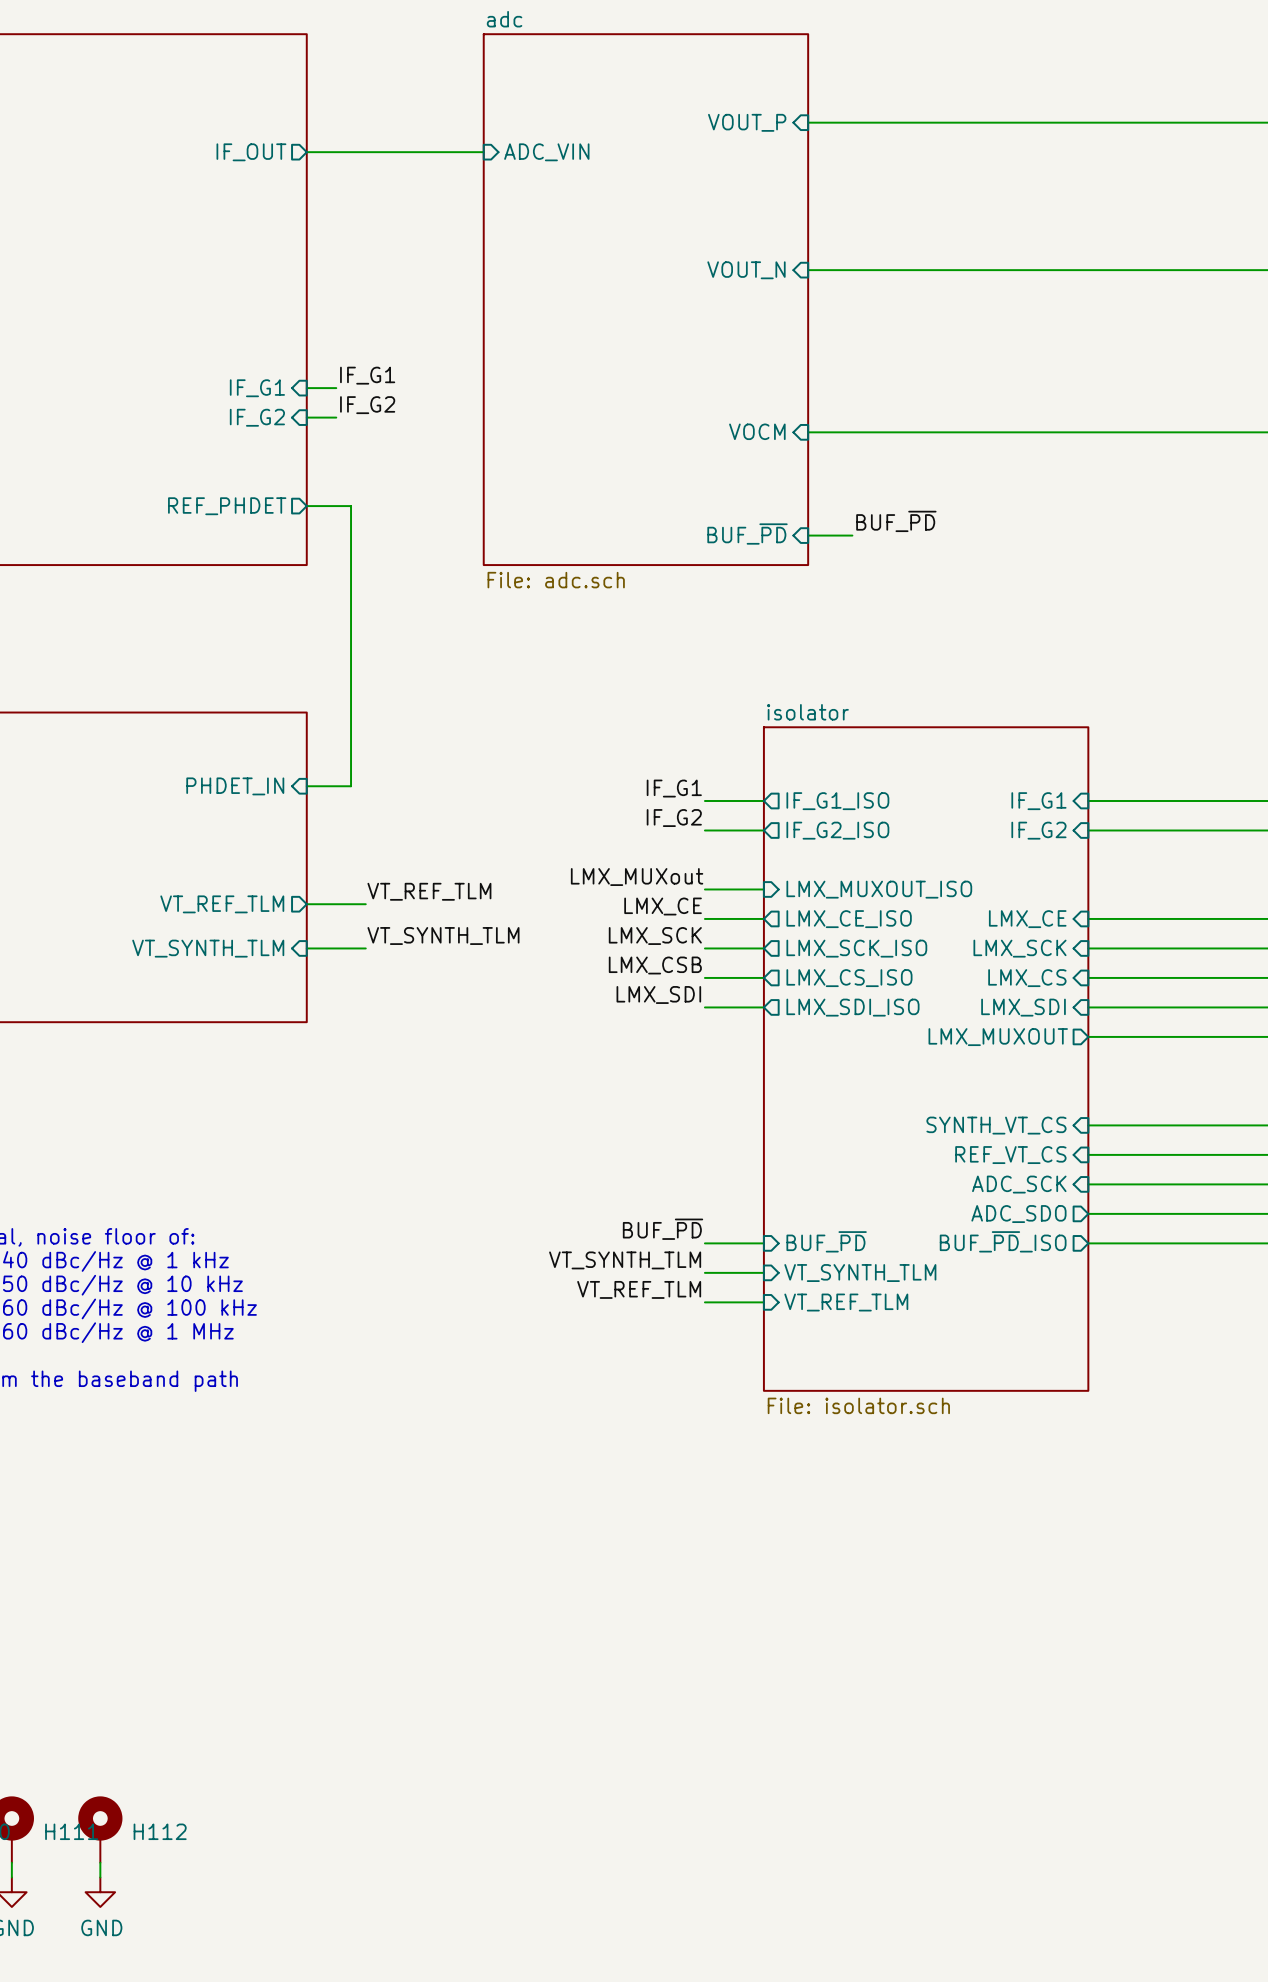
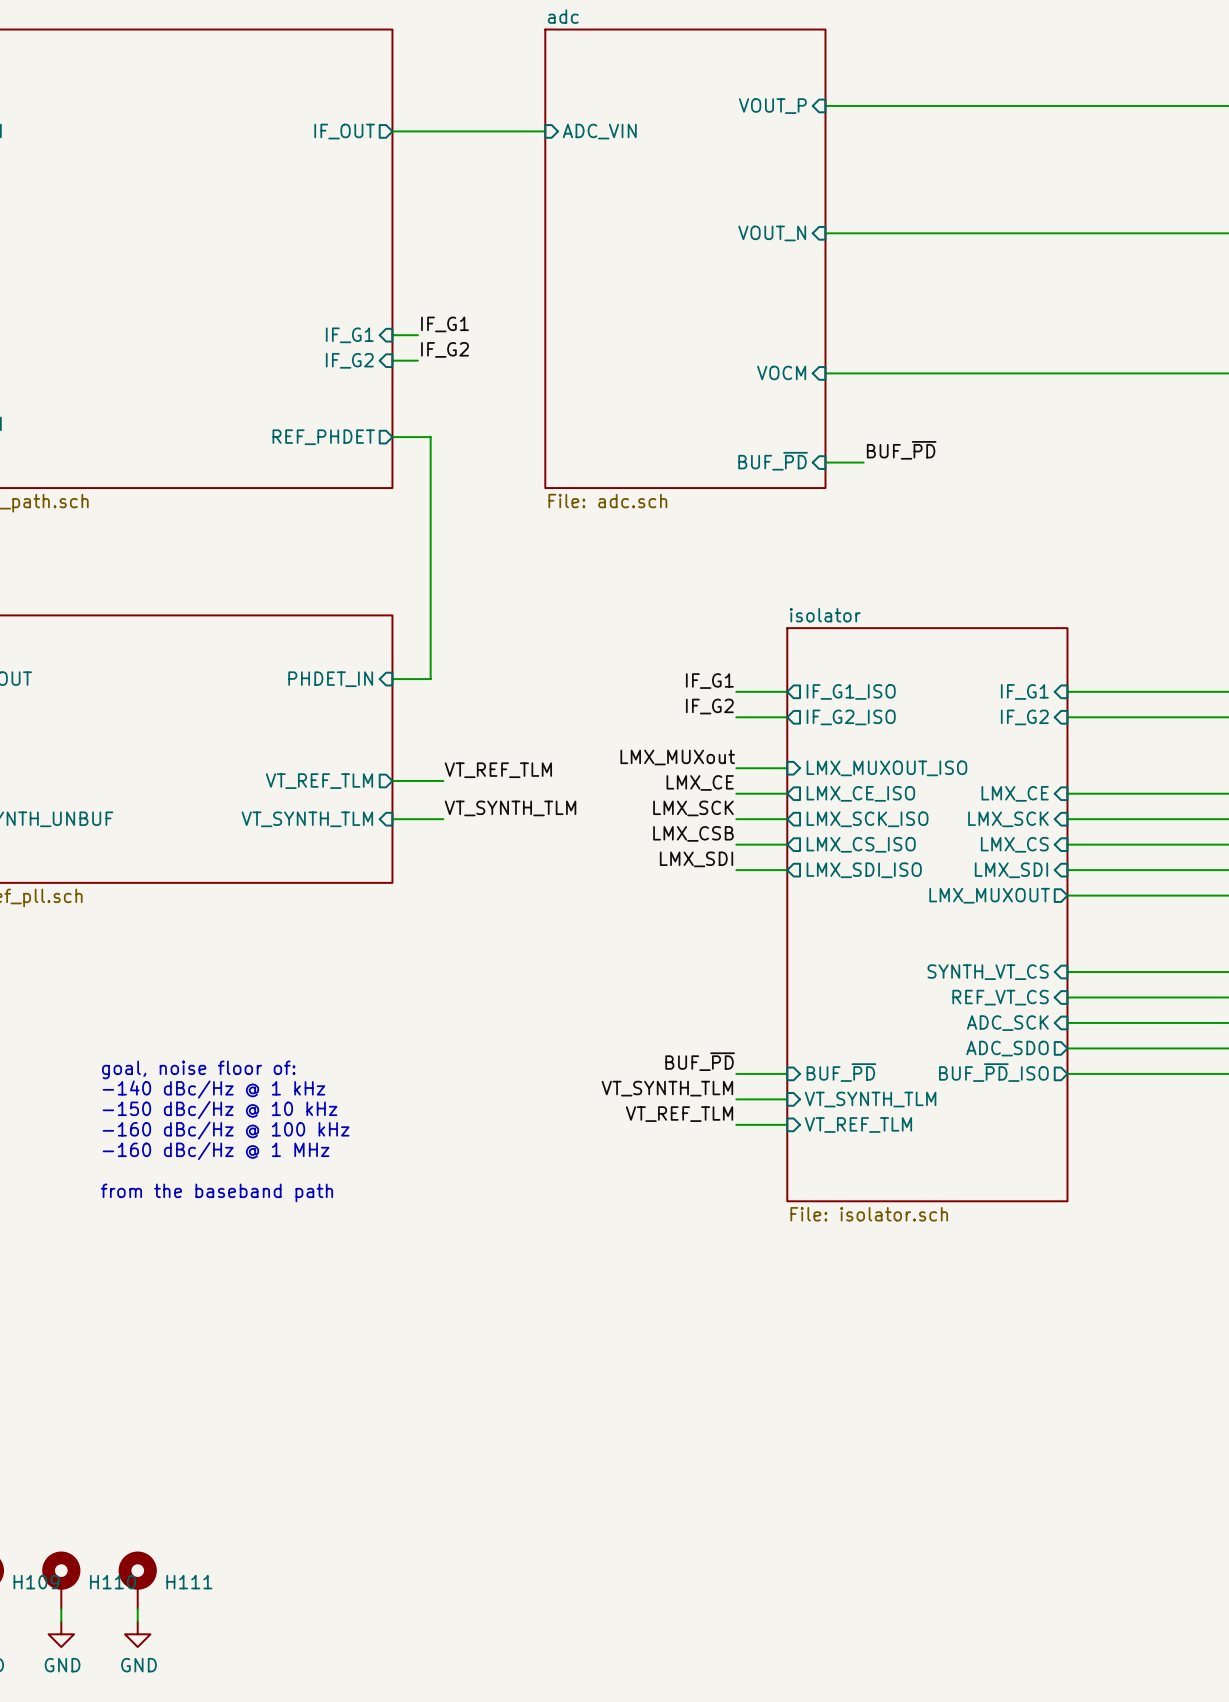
H112: (100, 1829) -> none
wire: (100, 1862) (100, 1877) -> none
power symbol: GND (100, 1892) -> none

